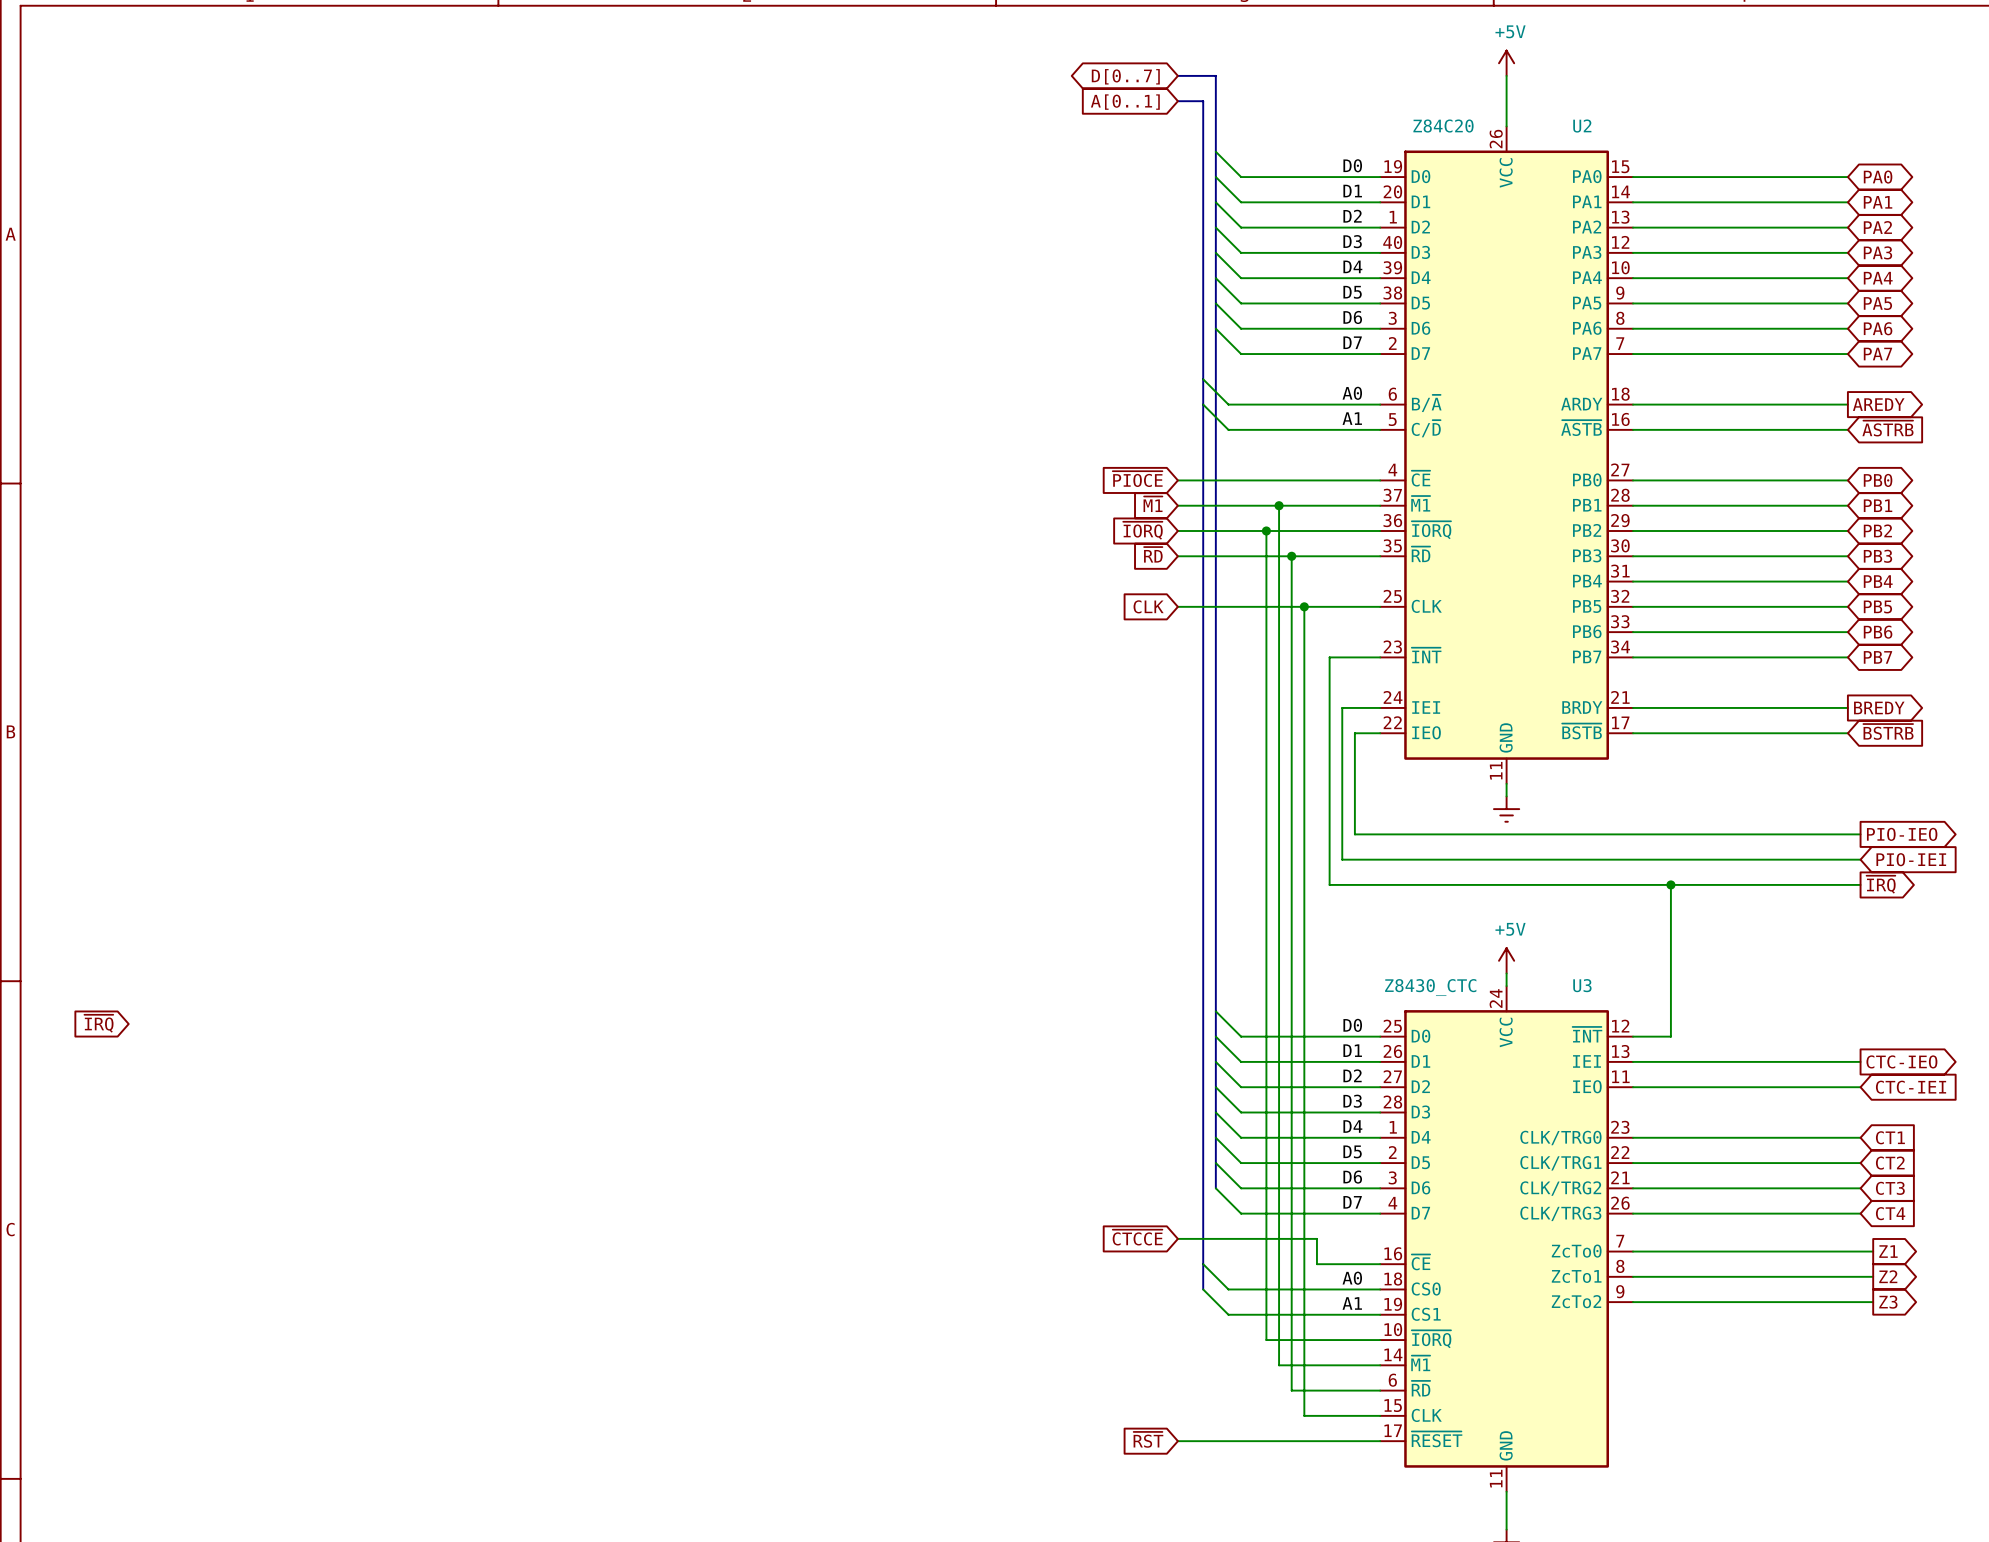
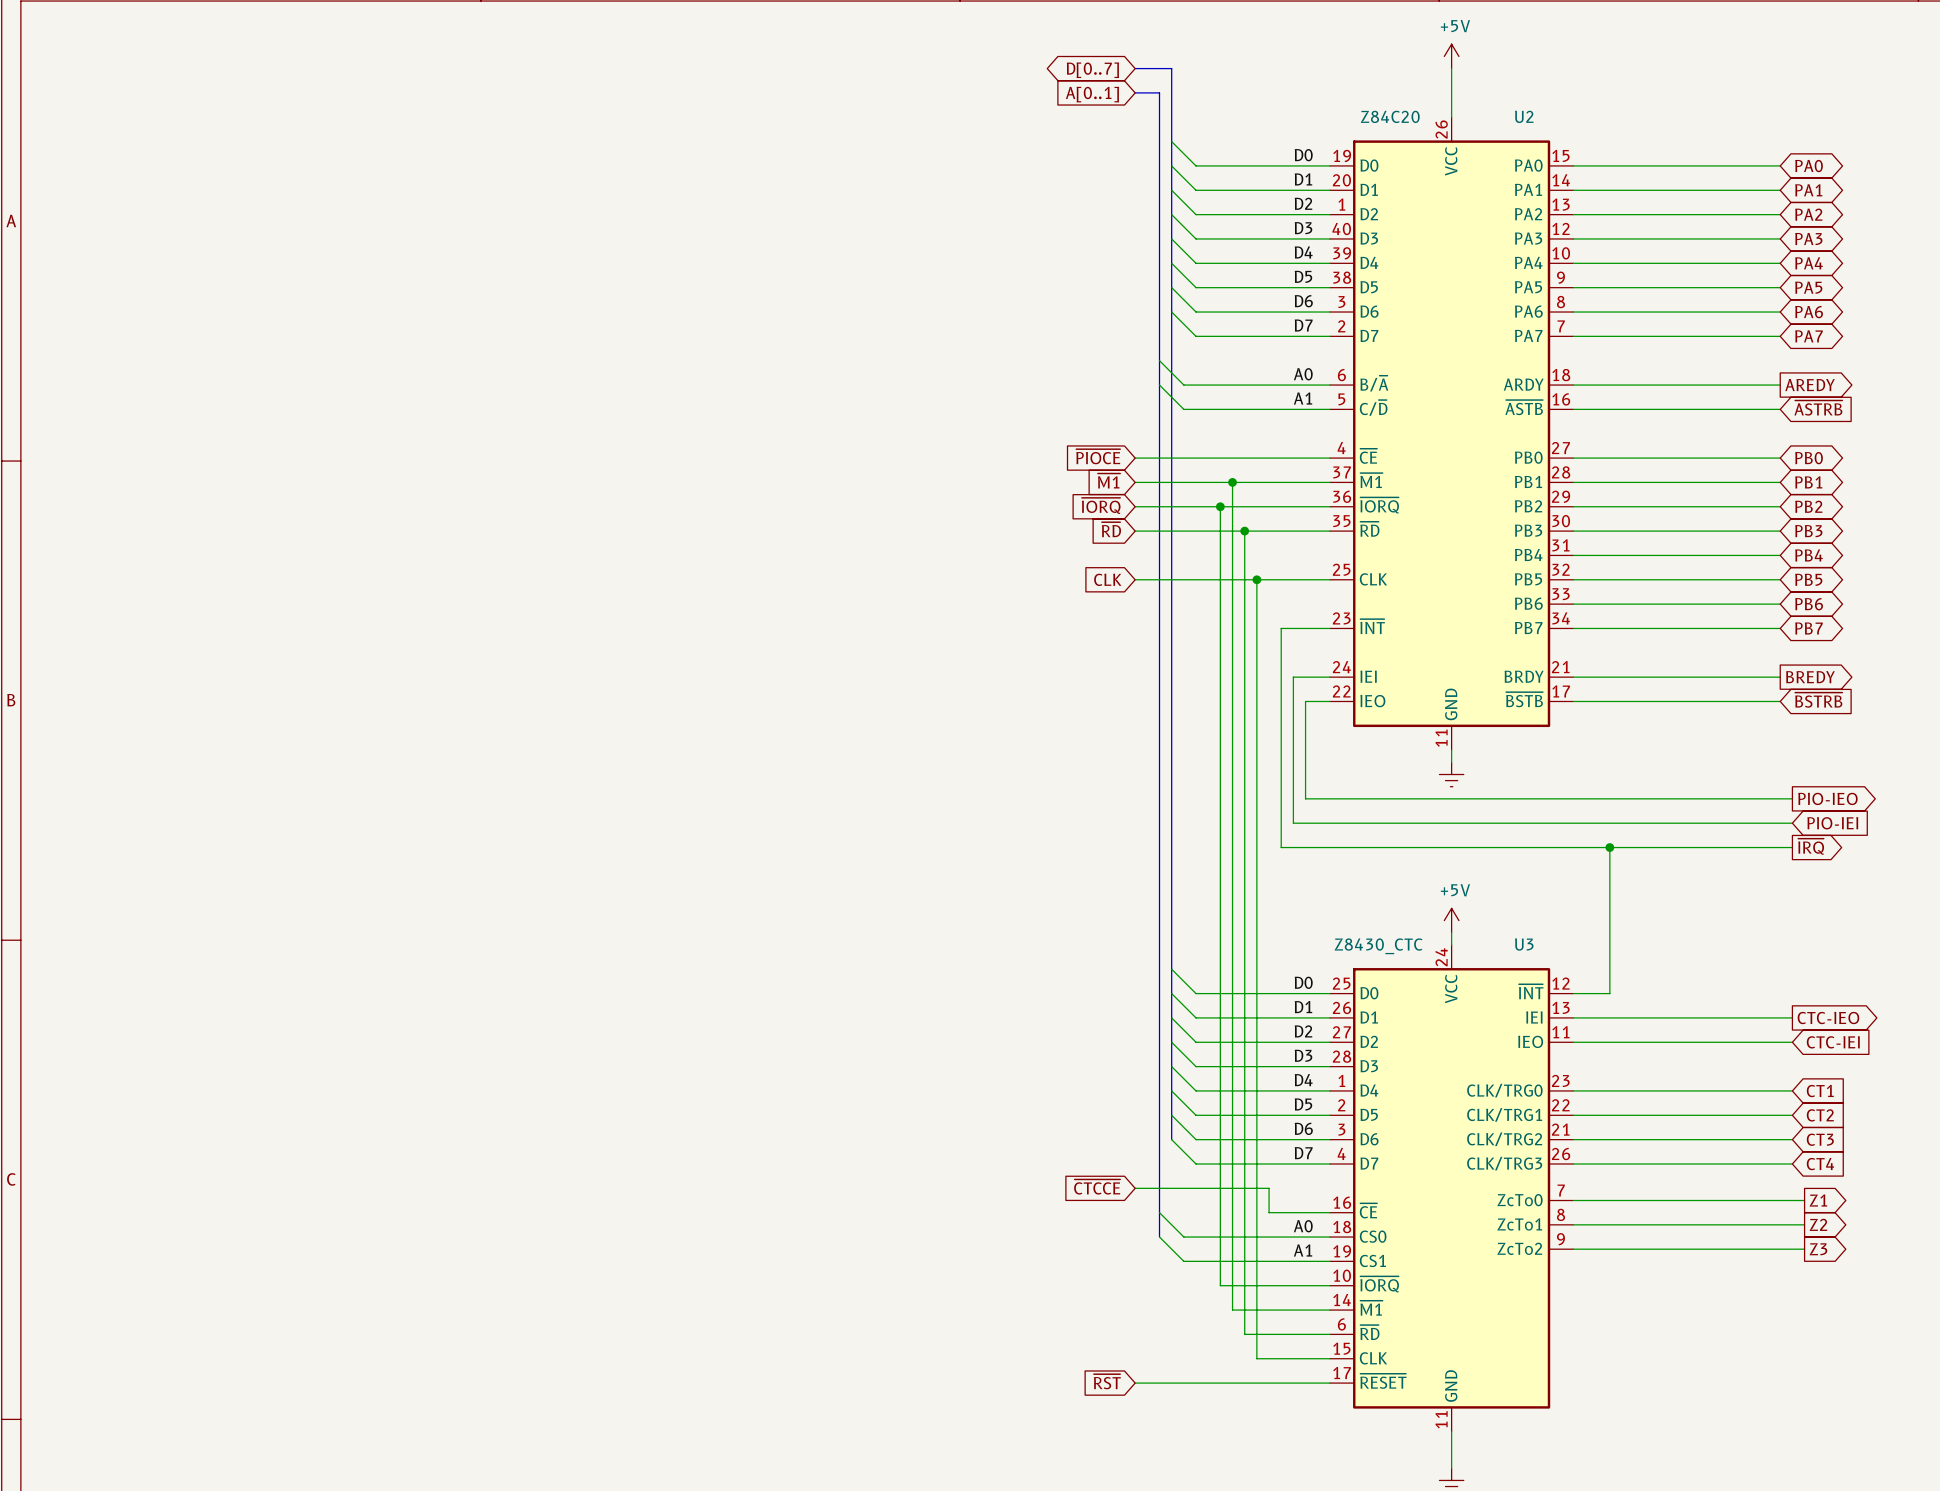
global label: ~{IRQ} (98, 1023) -> none

